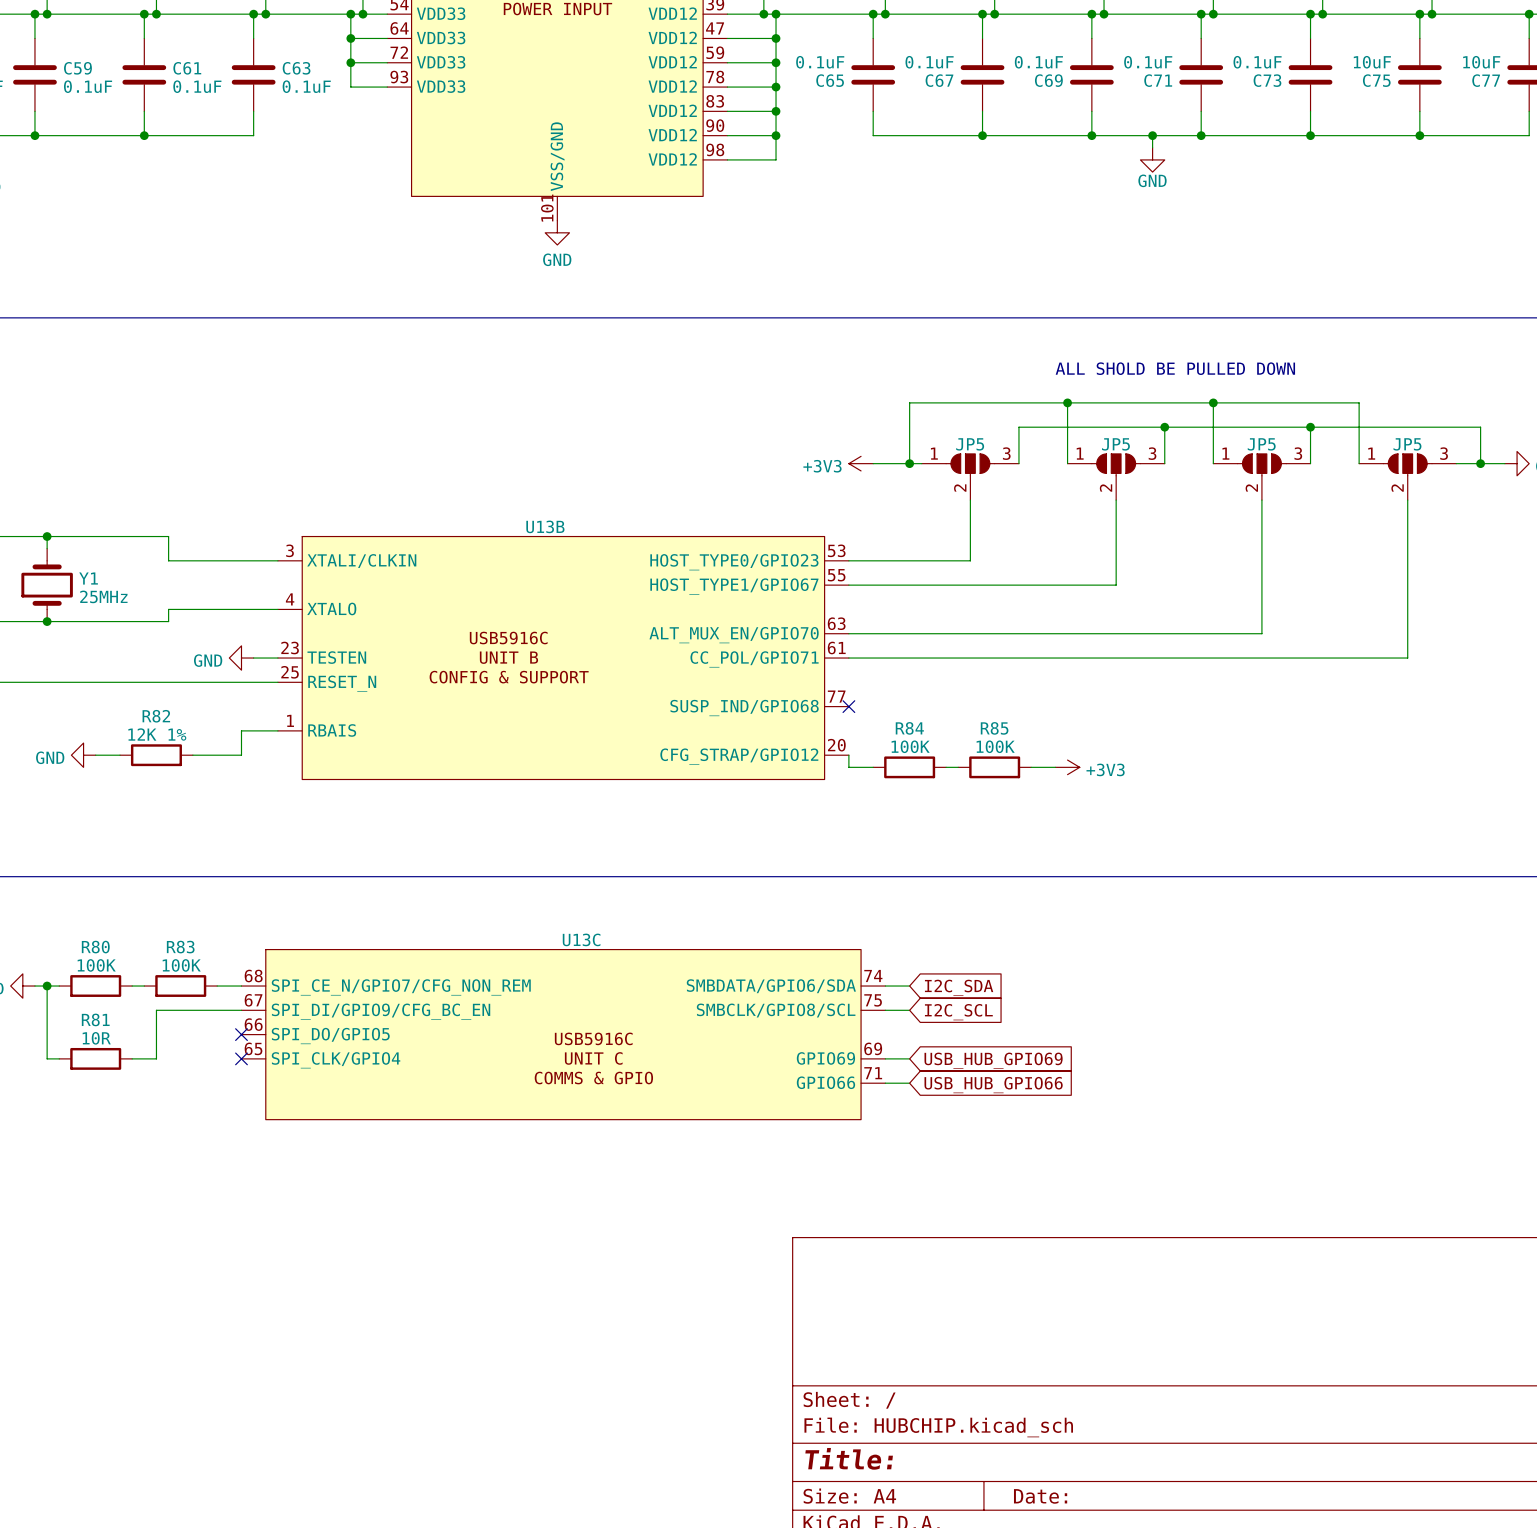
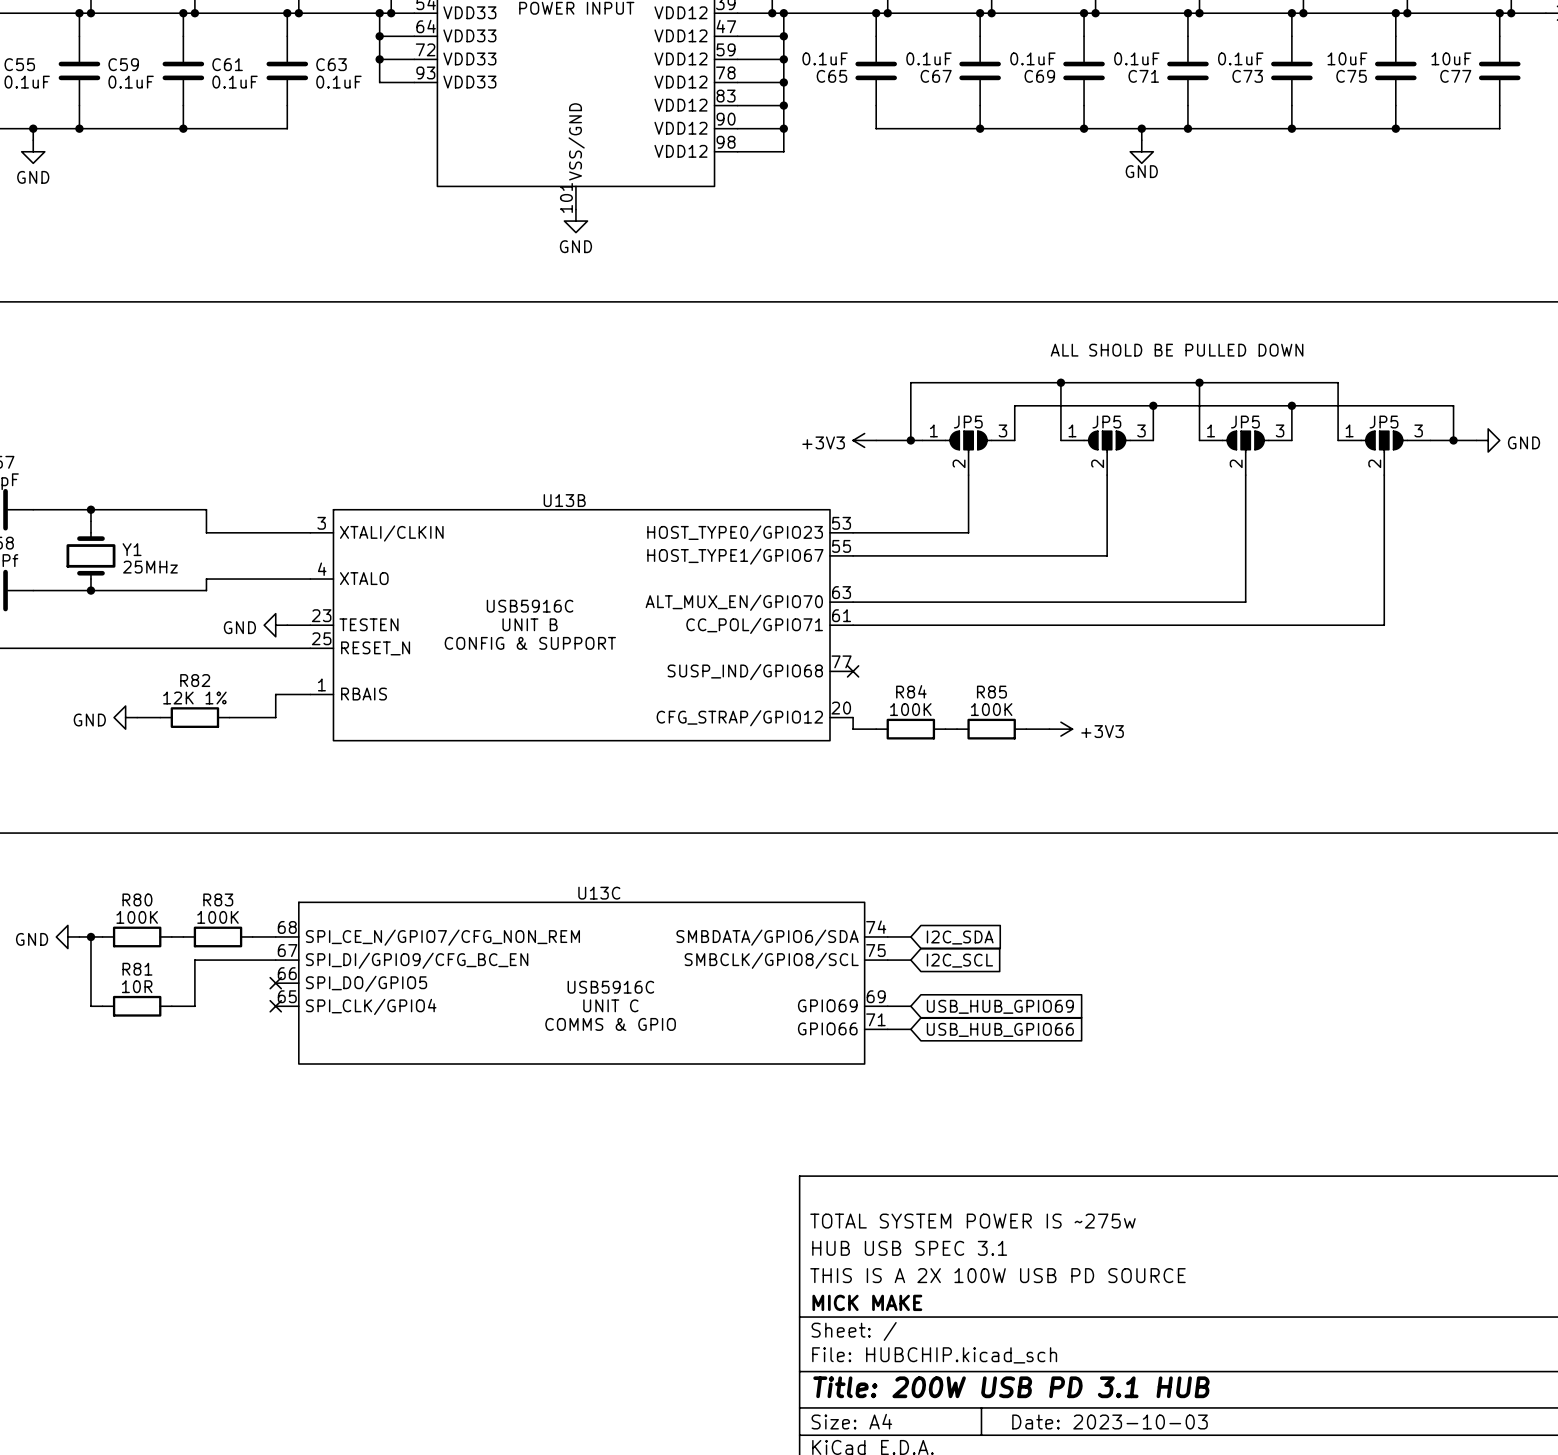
title block: none -> TOTAL SYSTEM POWER IS ~275w (972, 1221)
title block: none -> HUB USB SPEC 3.1 (909, 1248)
title block: none -> THIS IS A 2X 100W USB PD SOURCE (997, 1275)
title block: none -> MICK MAKE (867, 1302)
title block: Title: (849, 1458) -> Title: 200W USB PD 3.1 HUB (1011, 1387)
title block: Date: (1040, 1496) -> Date: 2023-10-03 (1110, 1421)

